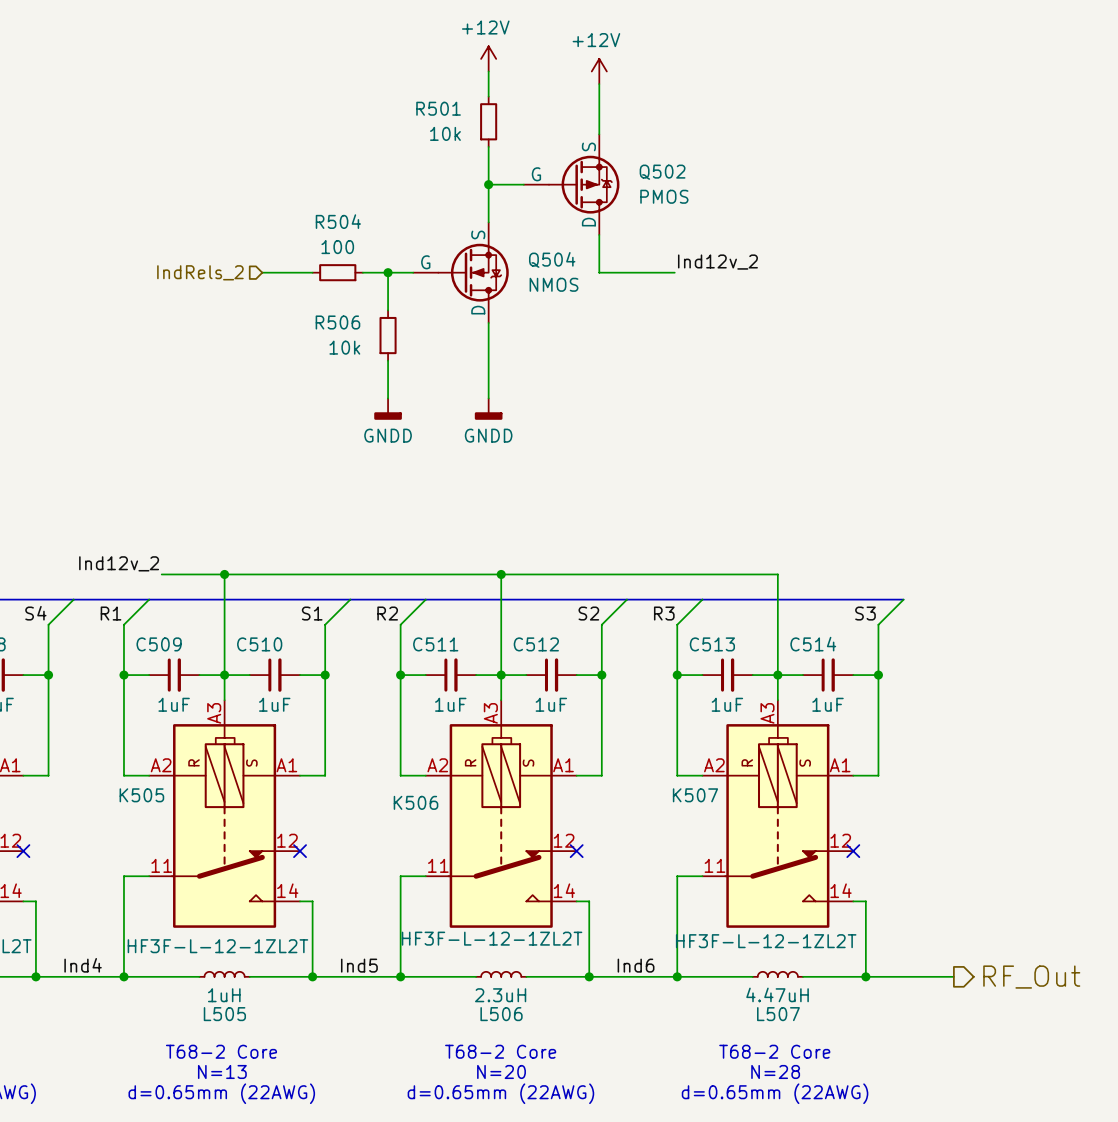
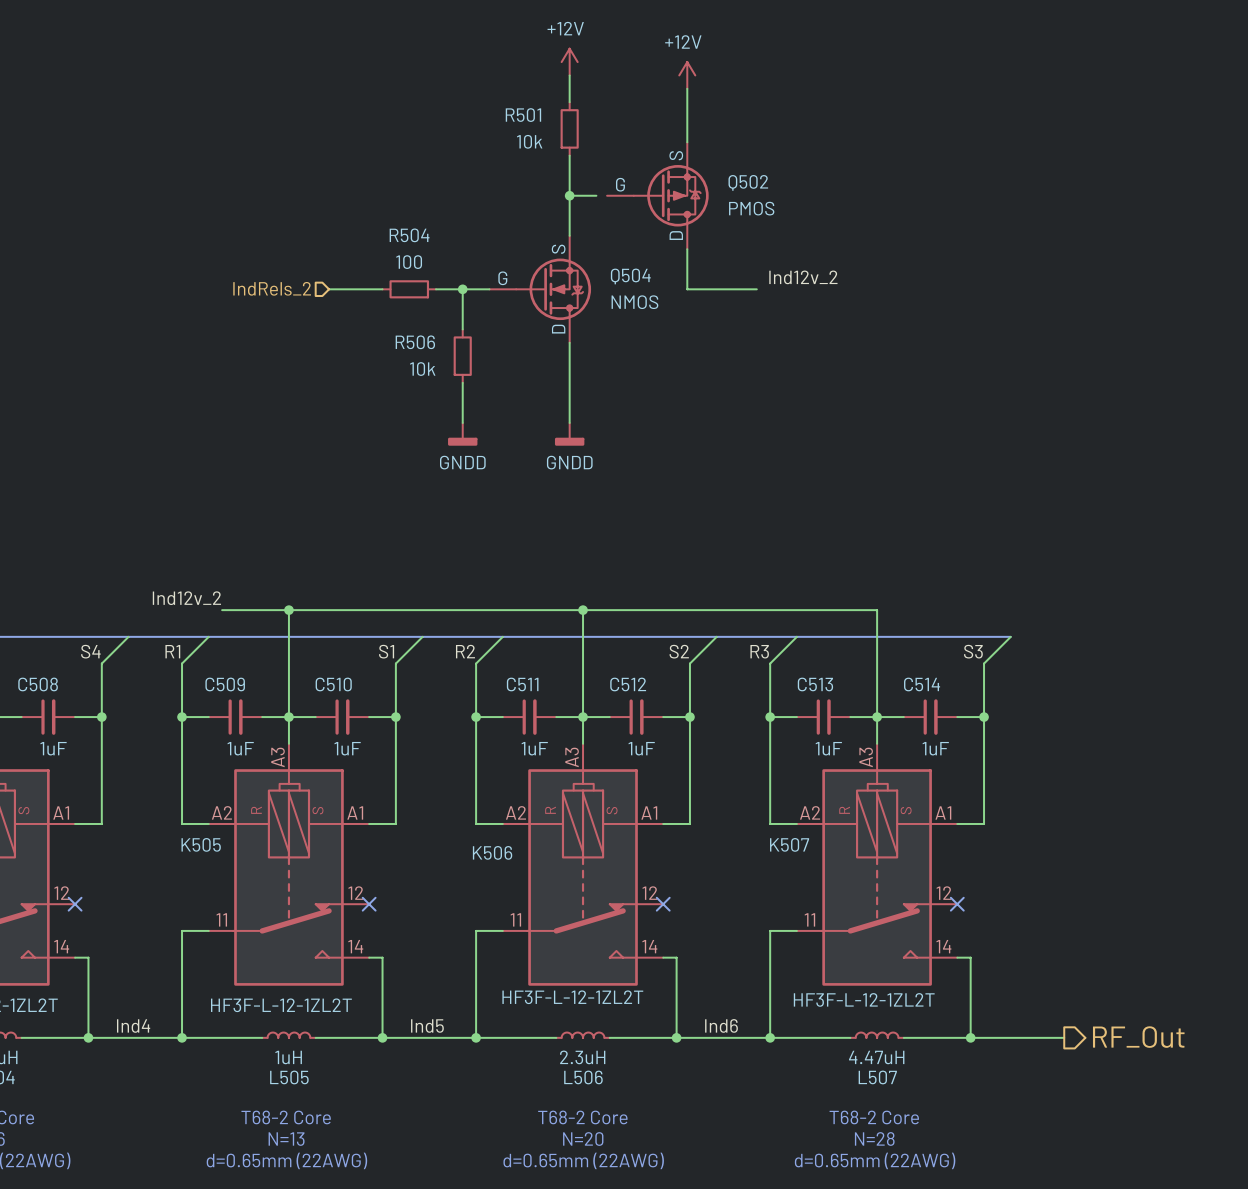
wire: (513, 184) (523, 184) -> none
wire: (664, 272) (674, 272) -> none

